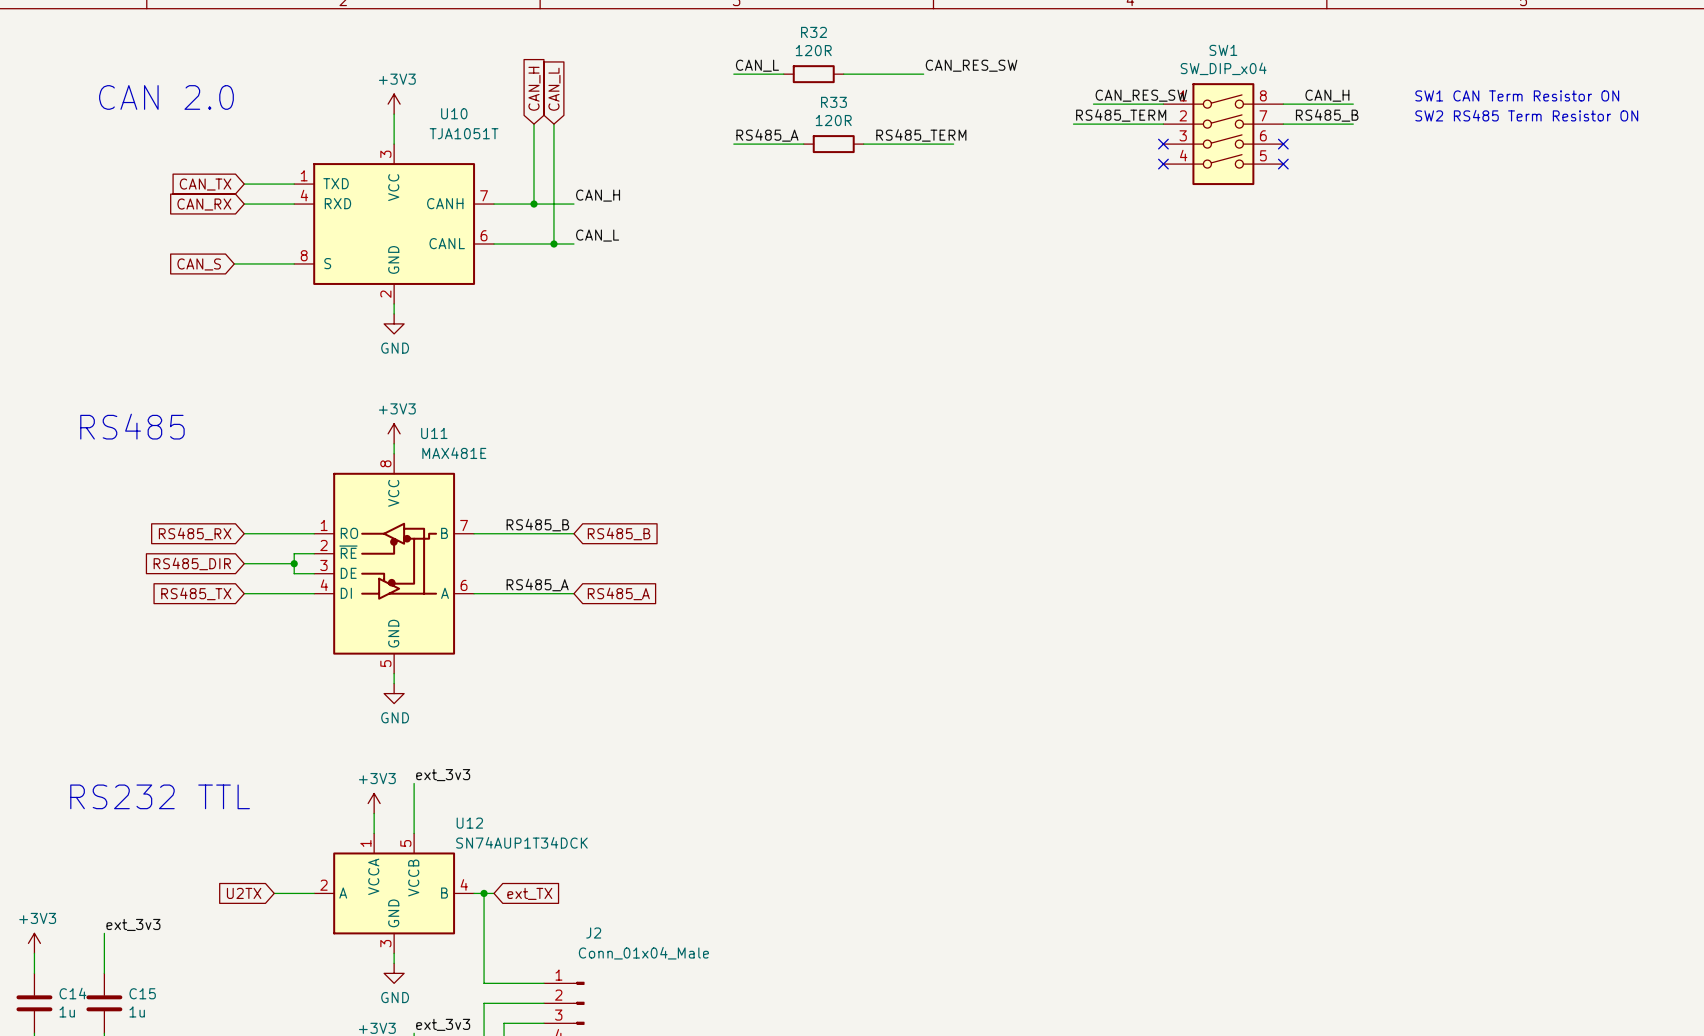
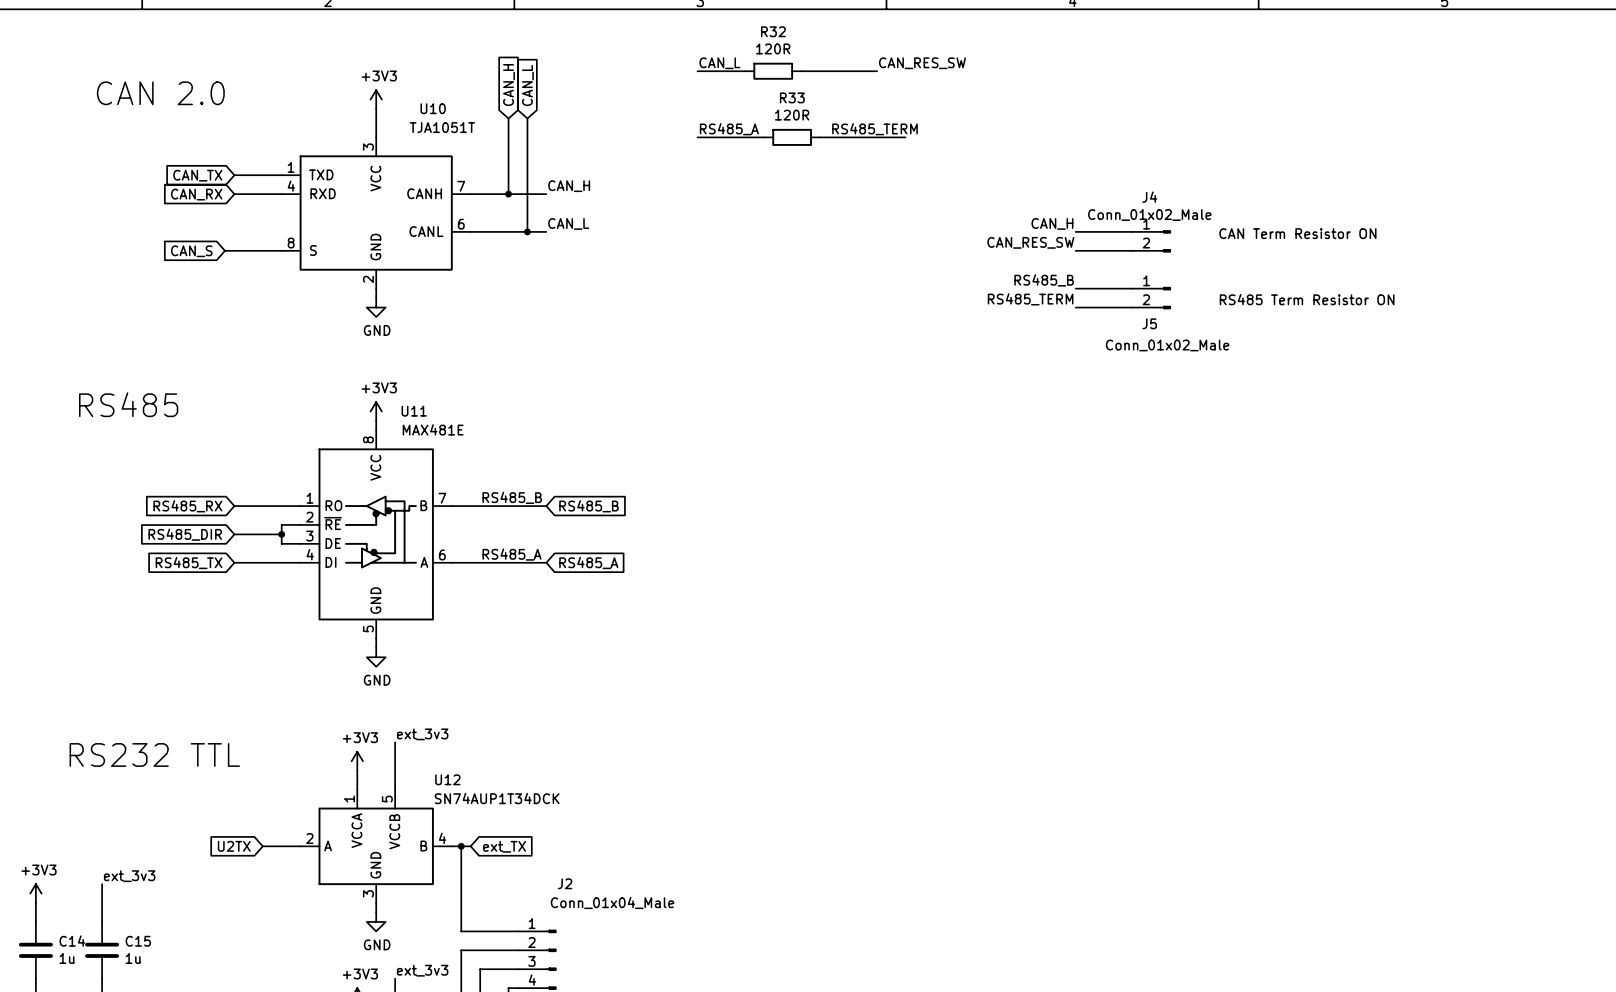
label position: CAN_RES_SW (1141, 95) -> CAN_RES_SW (1030, 242)
label: CAN_H (1327, 95) -> none
text: SW1 CAN Term Resistor ON (1517, 95) -> none
wire: (1093, 104) (1163, 104) -> none
wire: (1283, 104) (1353, 104) -> none
label: RS485_TERM (1121, 115) -> none
label: RS485_B (1327, 115) -> none
text: SW2 RS485 Term Resistor ON (1526, 115) -> none
wire: (1073, 124) (1163, 124) -> none
wire: (1283, 124) (1353, 124) -> none
SW1: SW_DIP_x04 (1223, 134) -> none
no-connect mark: (1163, 144) -> none
no-connect mark: (1283, 144) -> none
no-connect mark: (1163, 164) -> none
no-connect mark: (1283, 164) -> none
label: none -> CAN_H (1052, 223)
wire: none -> (1075, 231) (1132, 231)
text: none -> CAN Term Resistor ON (1297, 233)
J4: none -> Conn_01x02_Male (1151, 241)
wire: none -> (1075, 250) (1132, 250)
label: none -> RS485_B (1044, 280)
wire: none -> (1075, 288) (1132, 288)
J5: none -> Conn_01x02_Male (1151, 298)
label: none -> RS485_TERM (1030, 299)
text: none -> RS485 Term Resistor ON (1307, 299)
wire: none -> (1075, 307) (1132, 307)

